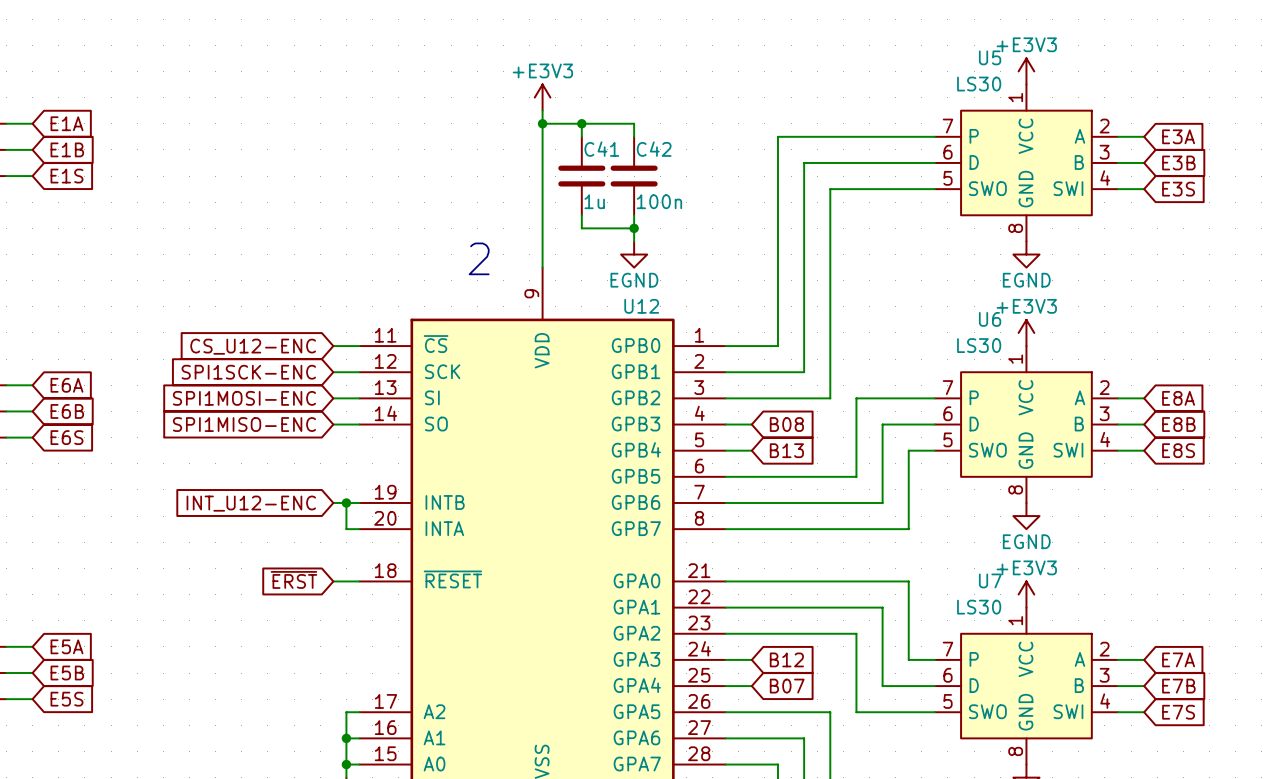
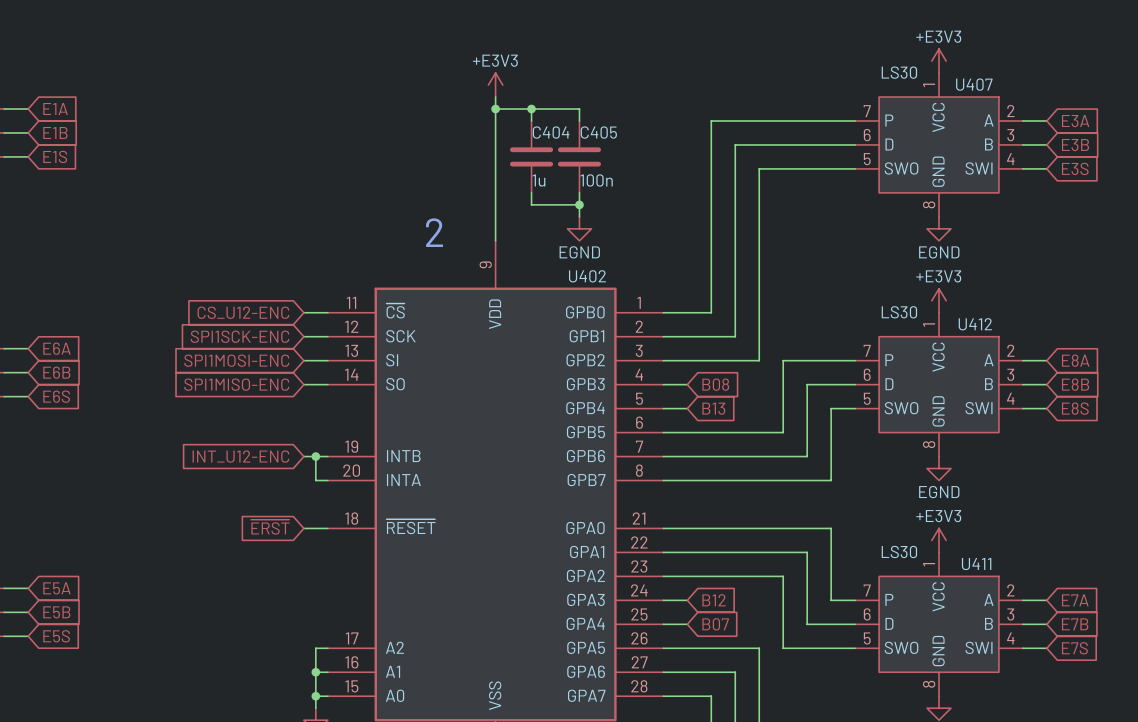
U5 name: U5 (990, 57) -> U407 (974, 84)
C41 name: C41 (601, 149) -> C404 (551, 132)
C42 name: C42 (654, 149) -> C405 (598, 132)
U12 name: U12 (641, 306) -> U402 (587, 276)
U6 name: U6 (990, 319) -> U412 (975, 324)
U7 name: U7 (990, 580) -> U411 (976, 564)

